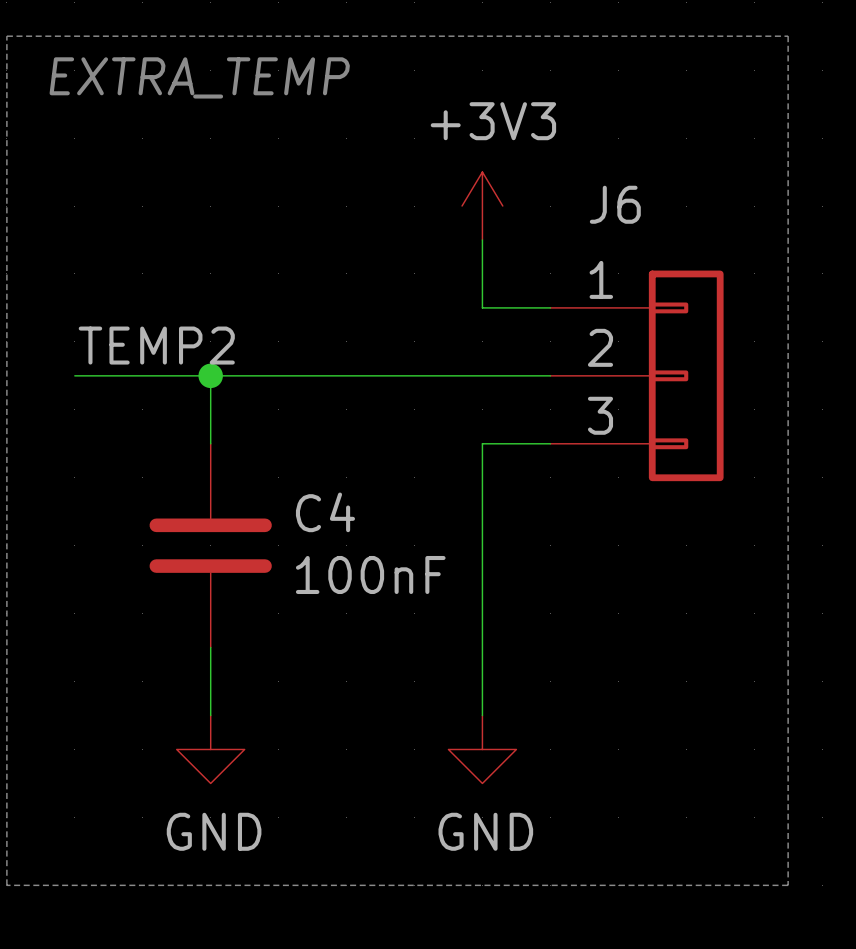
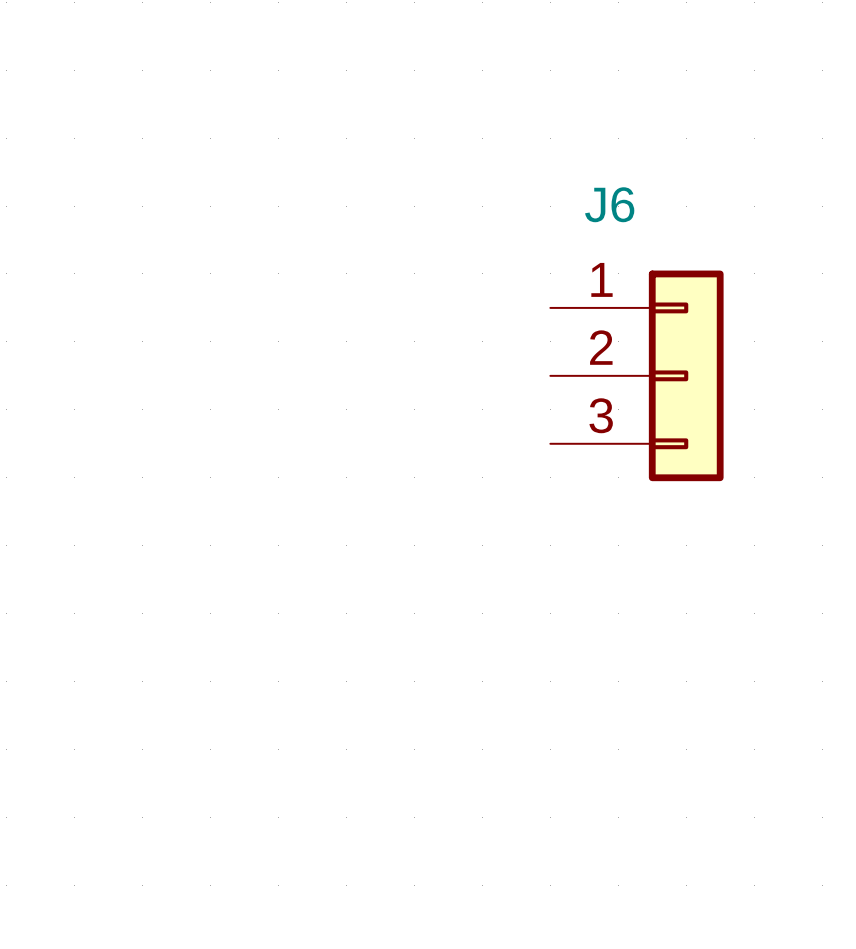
line: (6, 36) (788, 36) (788, 885) (6, 885) (6, 36) -> none
text: EXTRA_TEMP (199, 77) -> none
power symbol: +3V3 (482, 206) -> none
wire: (482, 239) (482, 307) (550, 307) -> none
label: TEMP2 (156, 345) -> none
wire: (74, 375) (550, 375) -> none
wire: (210, 375) (210, 443) -> none
junction: (210, 375) -> none
wire: (550, 443) (482, 443) (482, 715) -> none
C4: 100nF (210, 545) -> none
wire: (210, 647) (210, 715) -> none
power symbol: GND (210, 749) -> none
power symbol: GND (482, 749) -> none

